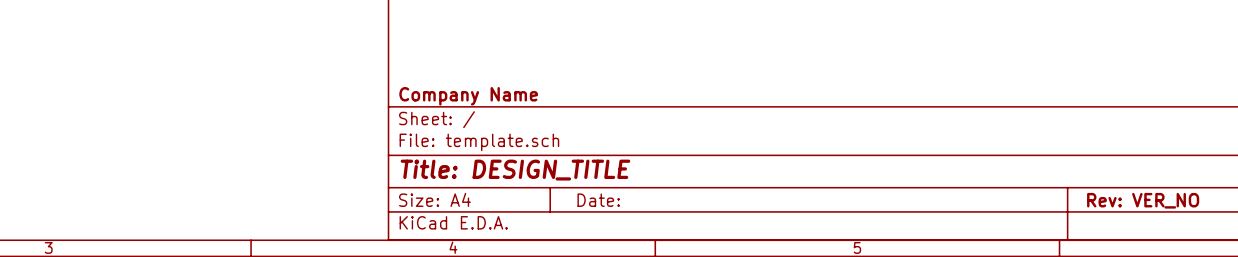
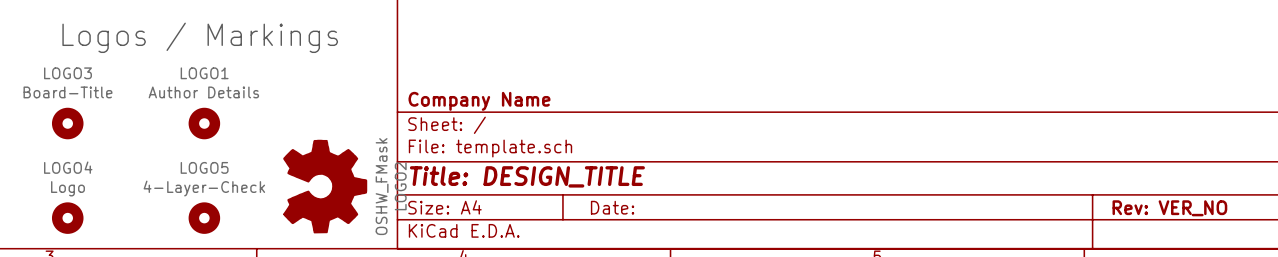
text: none -> Logos / Markings (200, 37)
LOGO3: none -> Board-Title (67, 123)
LOGO1: none -> Author Details (204, 123)
LOGO2: none -> OSHW_FMask (325, 186)
LOGO4: none -> Logo (67, 218)
LOGO5: none -> 4-Layer-Check (204, 218)

